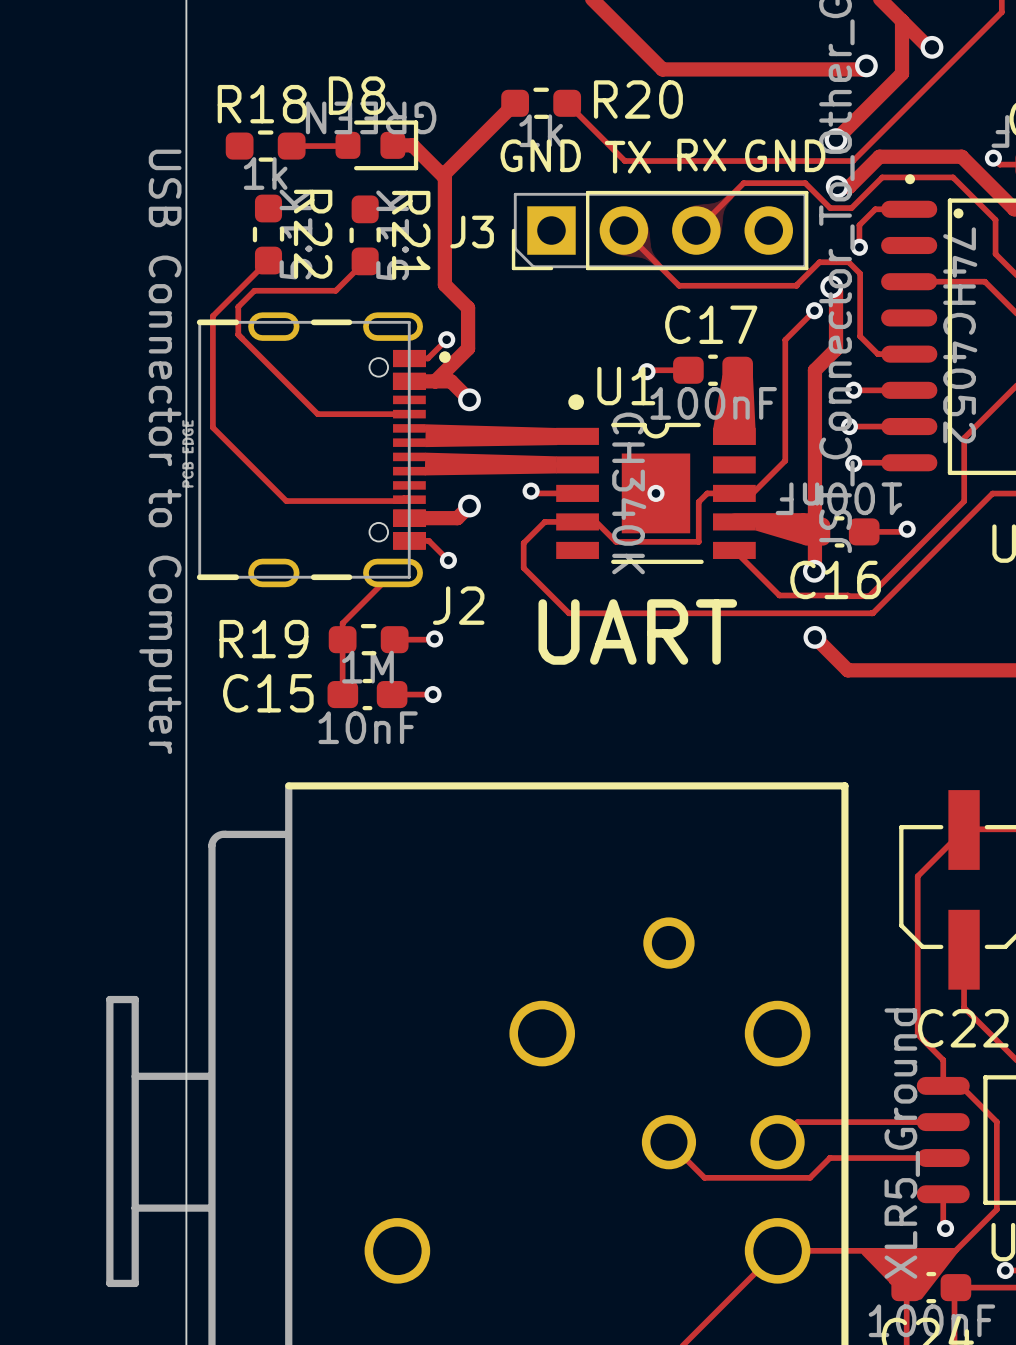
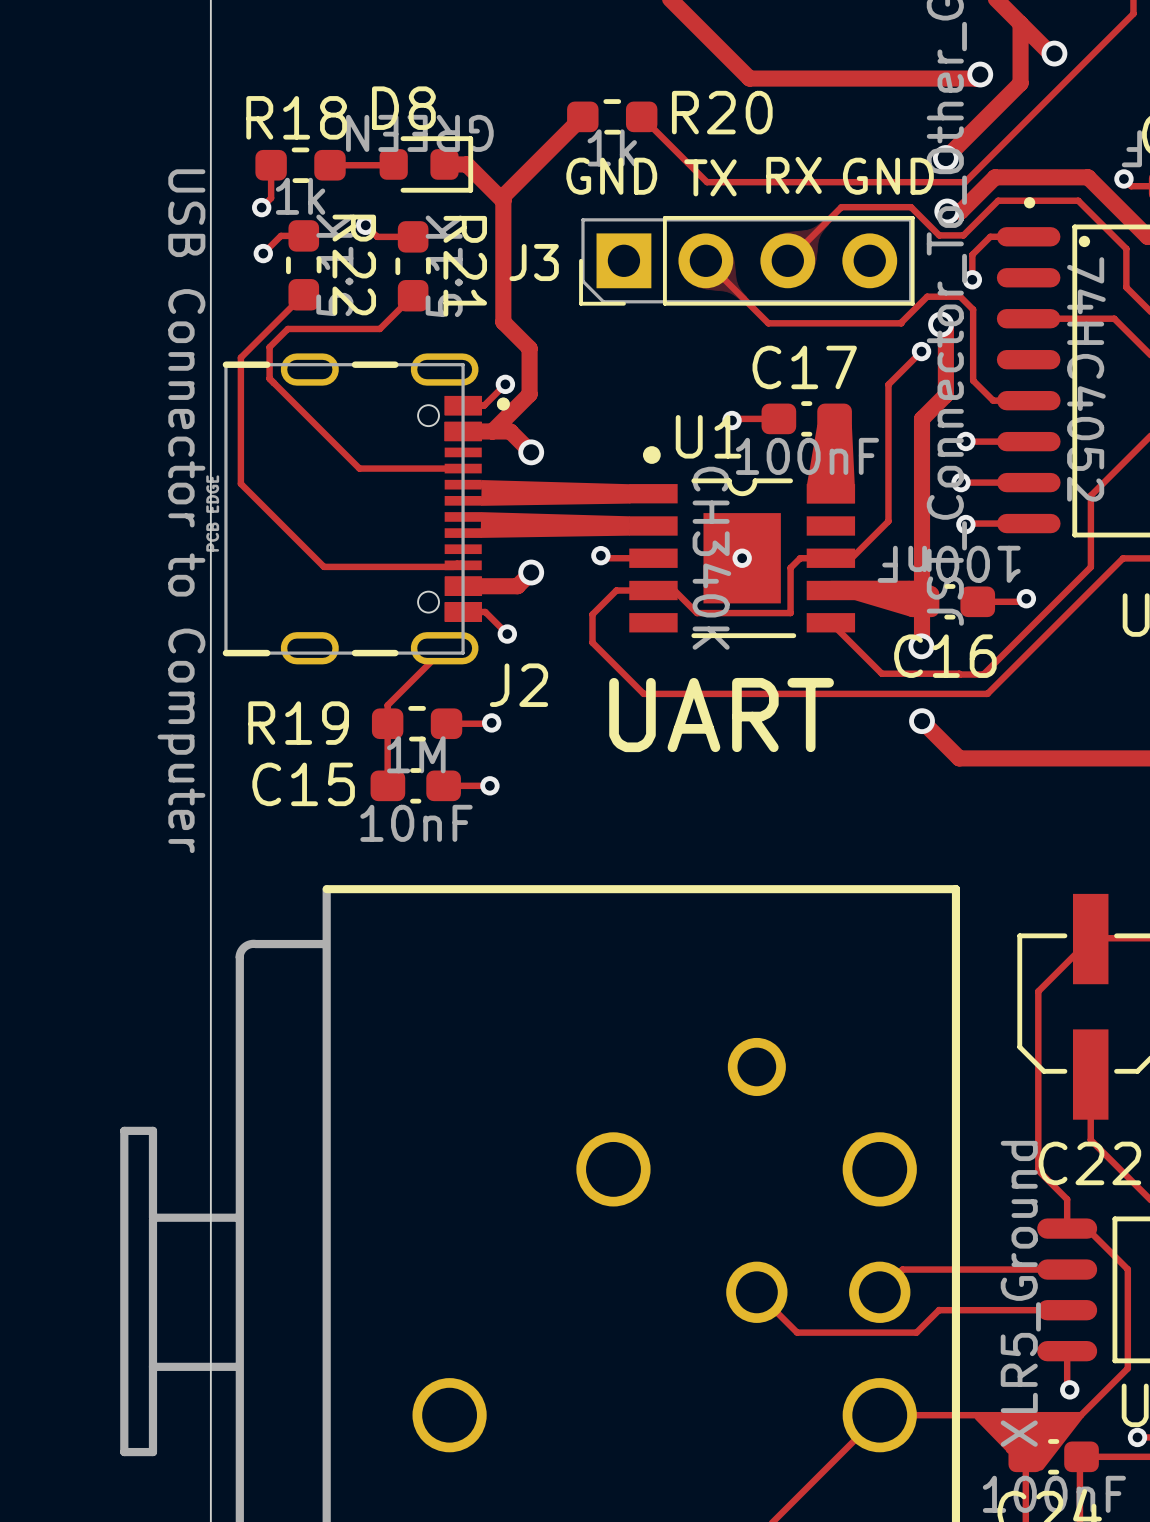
track: none -> (271, 165) (271, 198) (261, 207)
via: none -> (261, 207)
track: none -> (365, 225) (377, 236) (413, 236)
via: none -> (365, 225)
track: none -> (303, 235) (280, 235) (263, 253)
via: none -> (263, 253)

